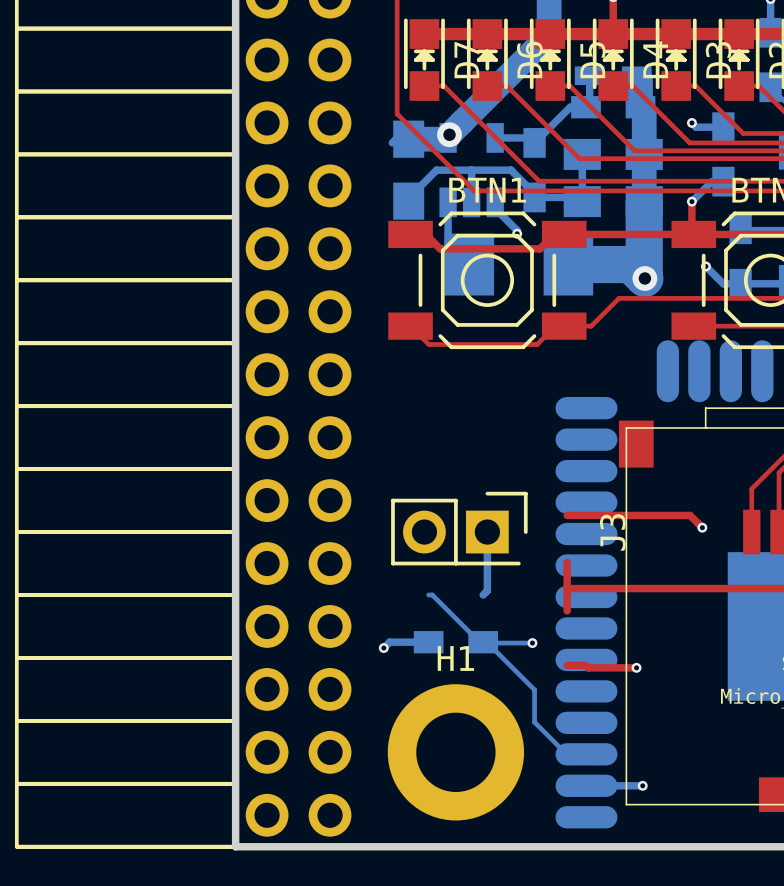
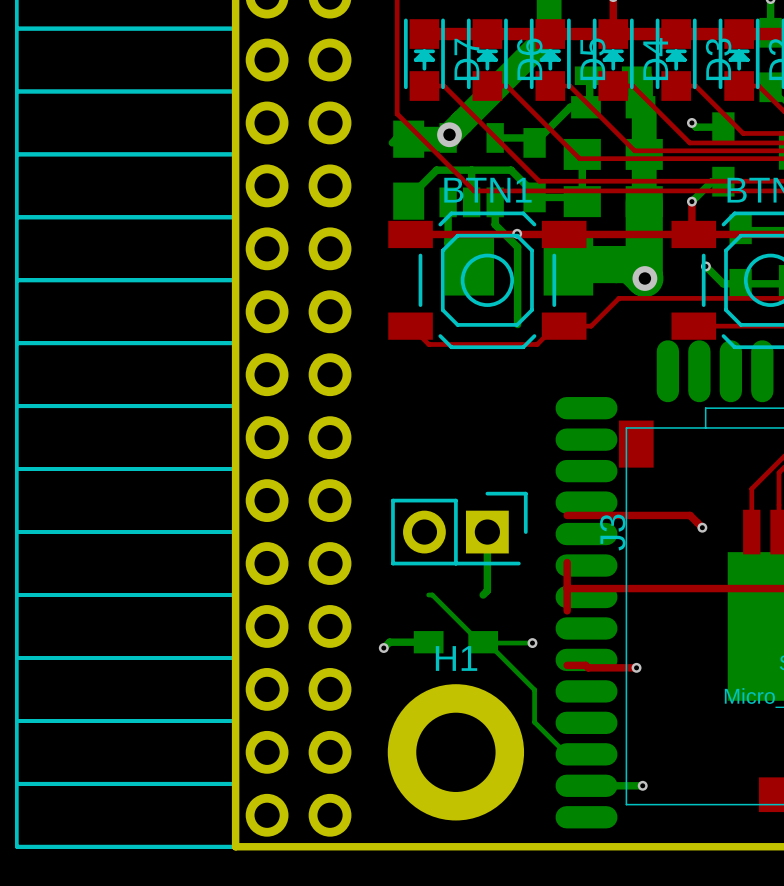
bottom track: (495, 208) (517, 230) (517, 233) -> (495, 208) (495, 224) (517, 247) (517, 324)
top track: (425, 234) (440, 248) (539, 248) (554, 234) -> (425, 234) (554, 234)

